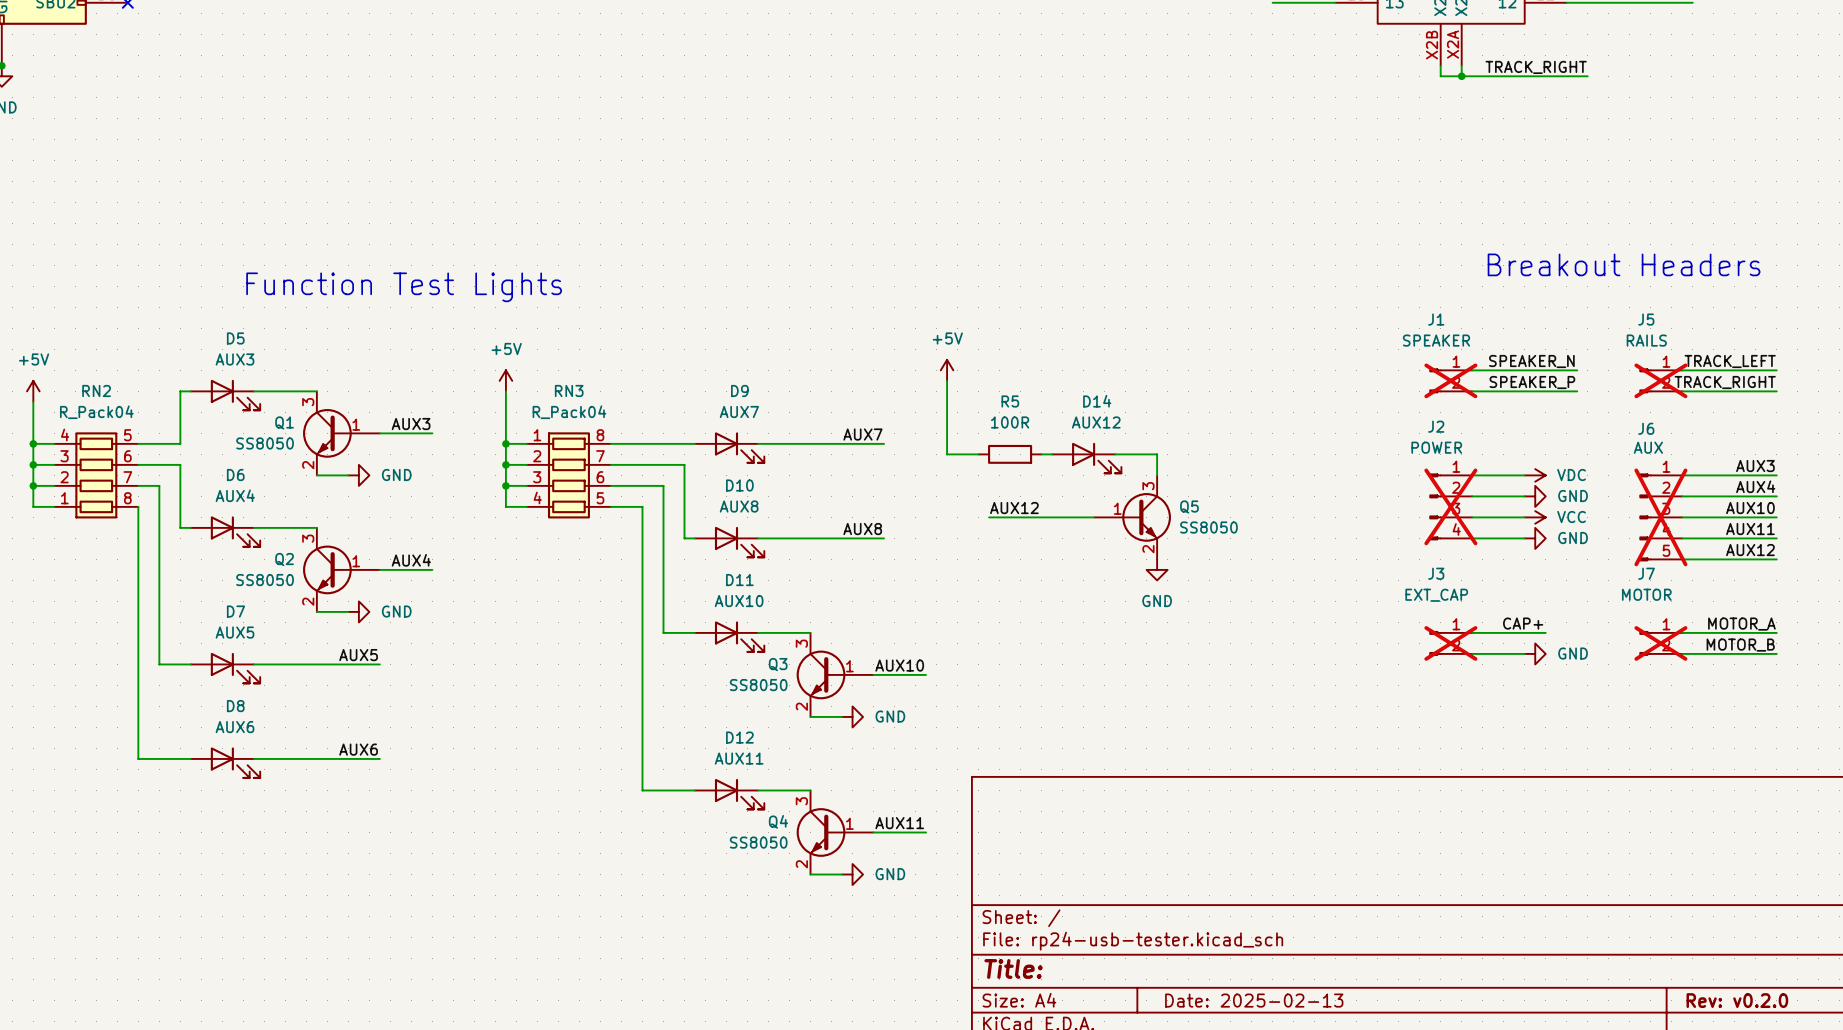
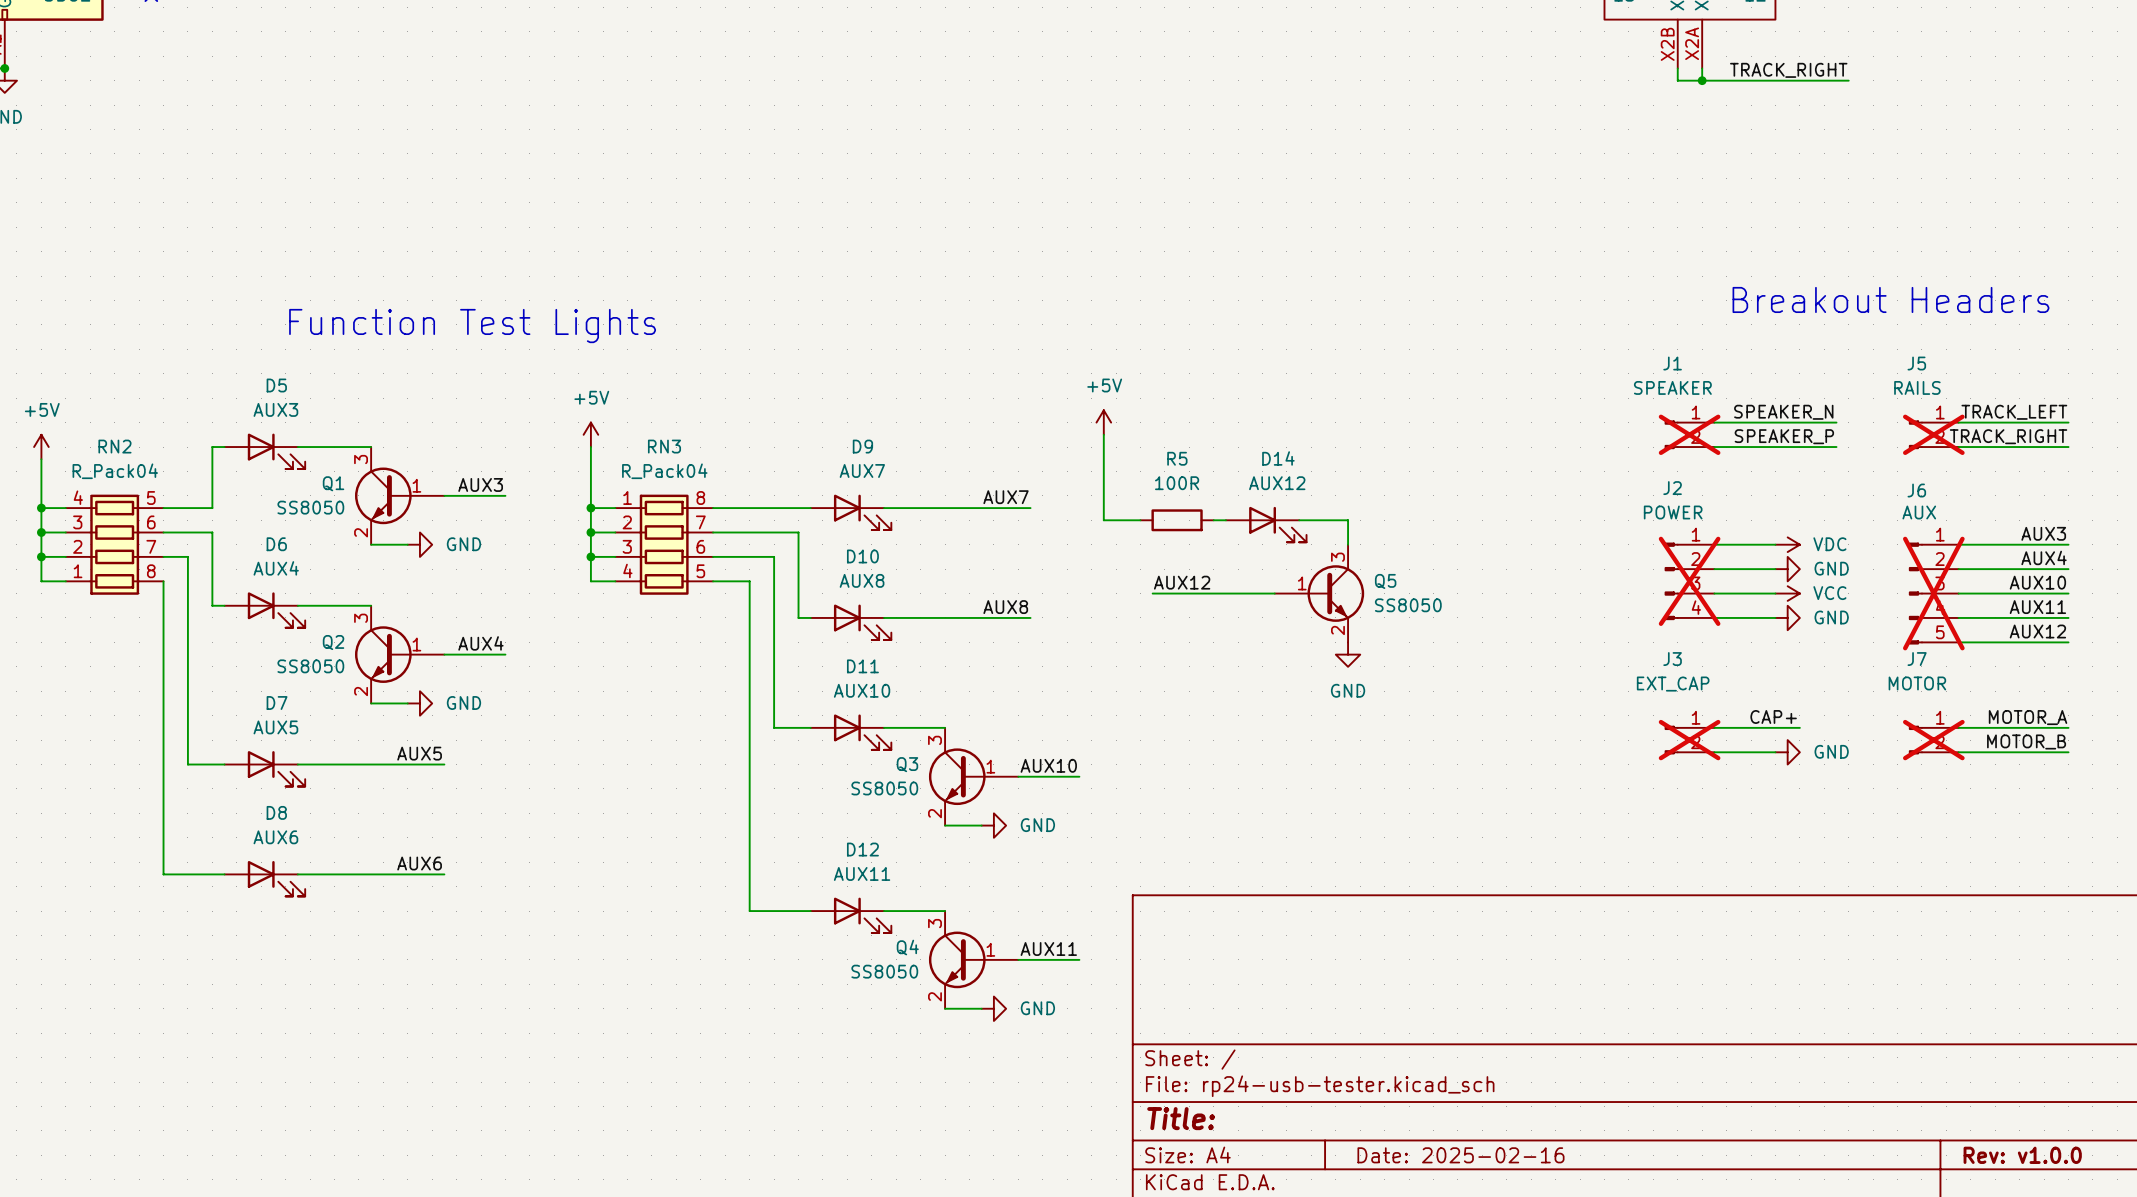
title block: Date: 2025-02-13 (1254, 1000) -> Date: 2025-02-16 (1460, 1155)
title block: Rev: v0.2.0 (1737, 1000) -> Rev: v1.0.0 (2022, 1155)

